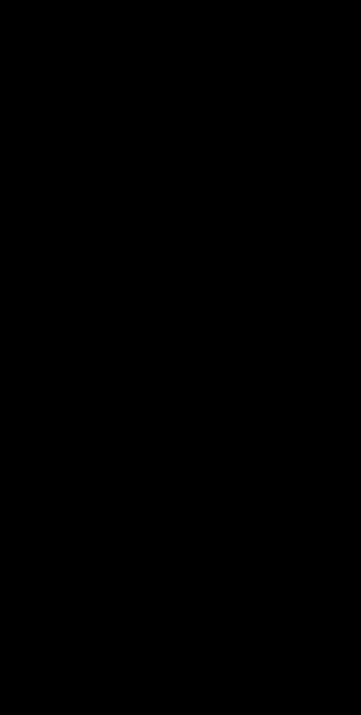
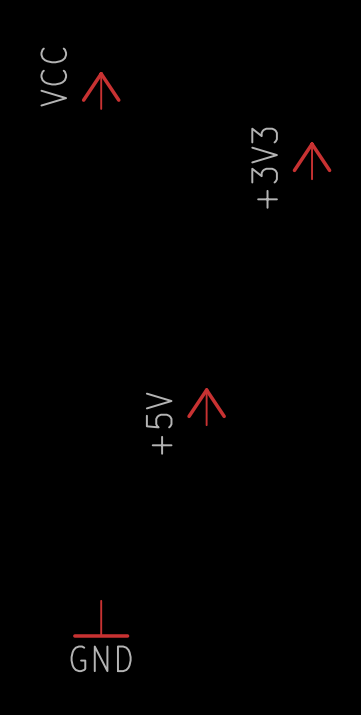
power symbol: none -> VCC (101, 90)
power symbol: none -> +3V3 (312, 160)
power symbol: none -> +5V (206, 406)
power symbol: none -> GND (101, 619)

